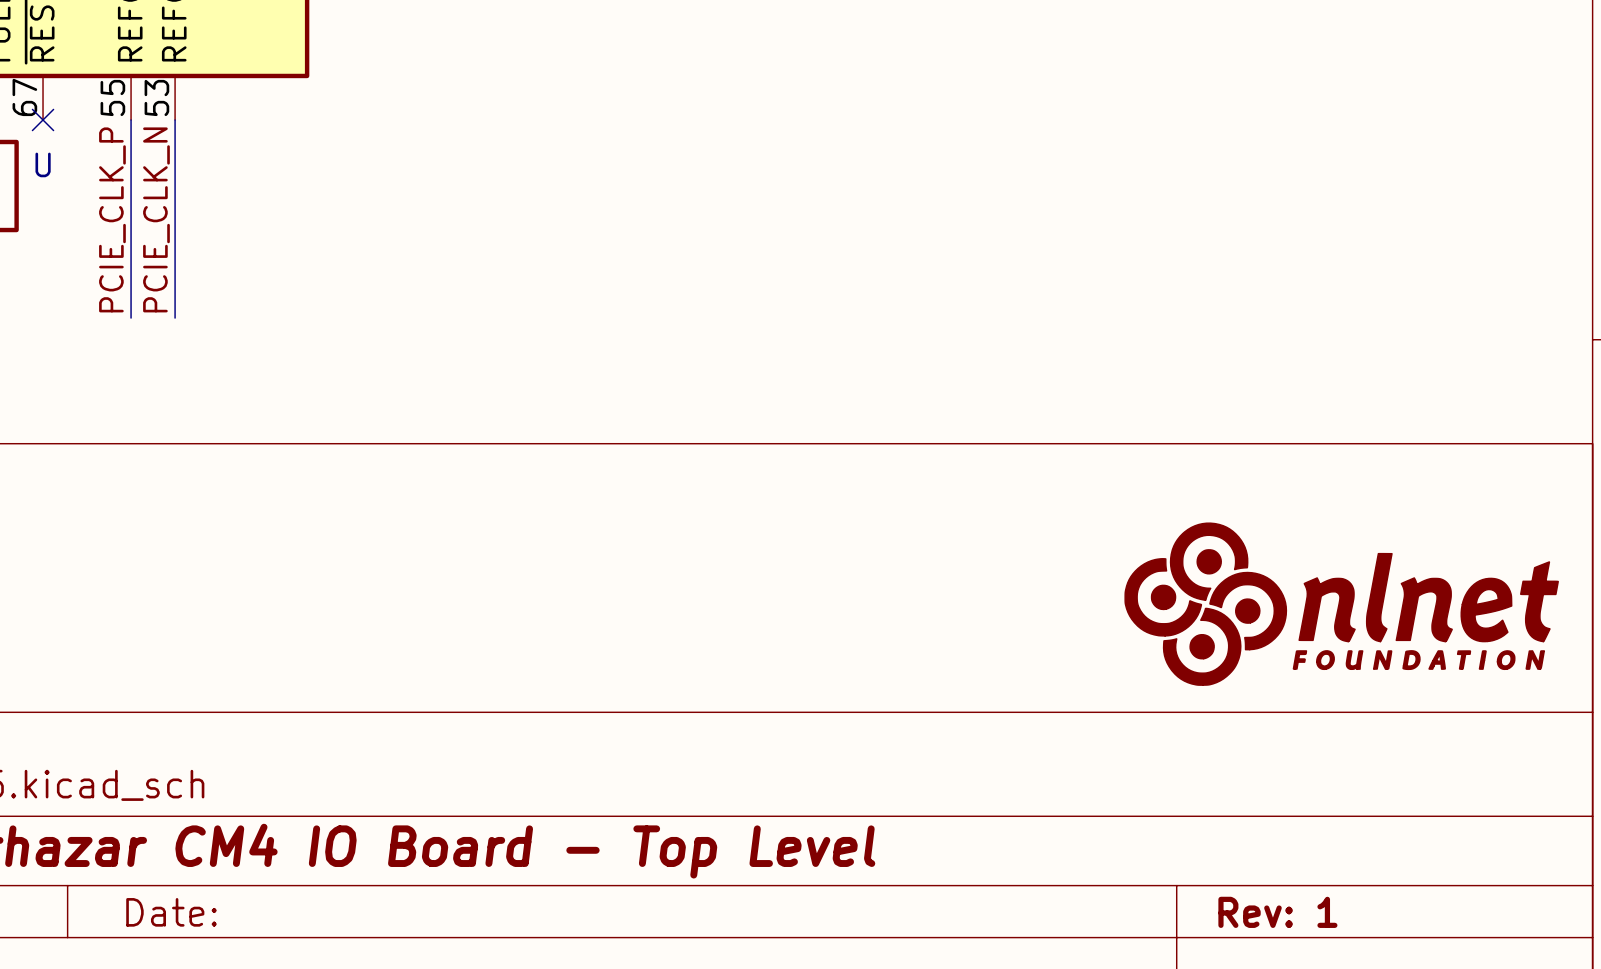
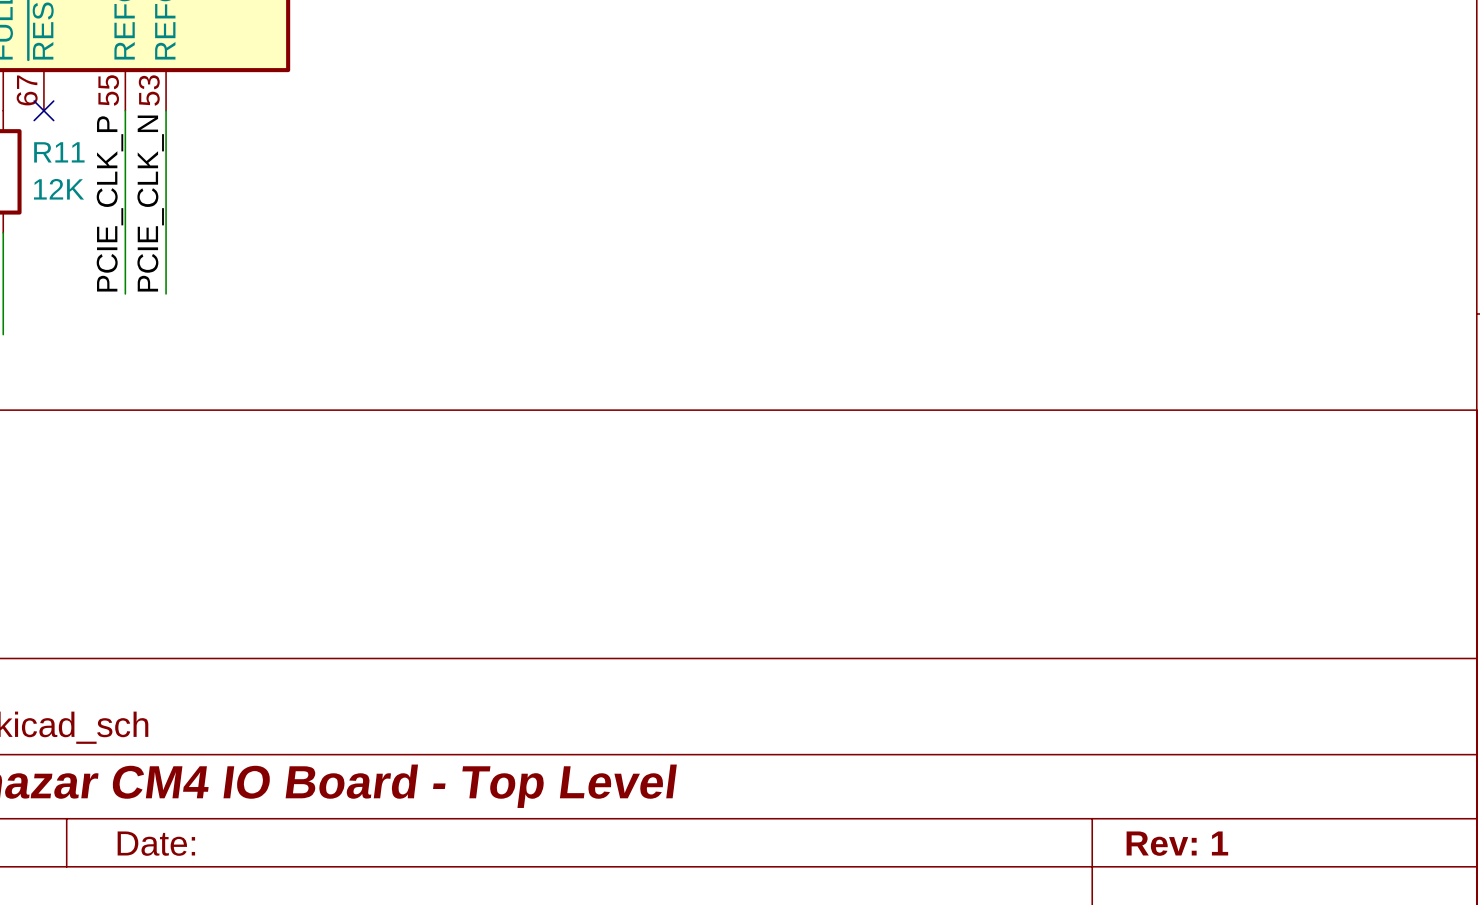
U name: U (43, 164) -> R11 (59, 152)
U value: none -> 12K (59, 189)
power symbol: (1341, 604) -> none

